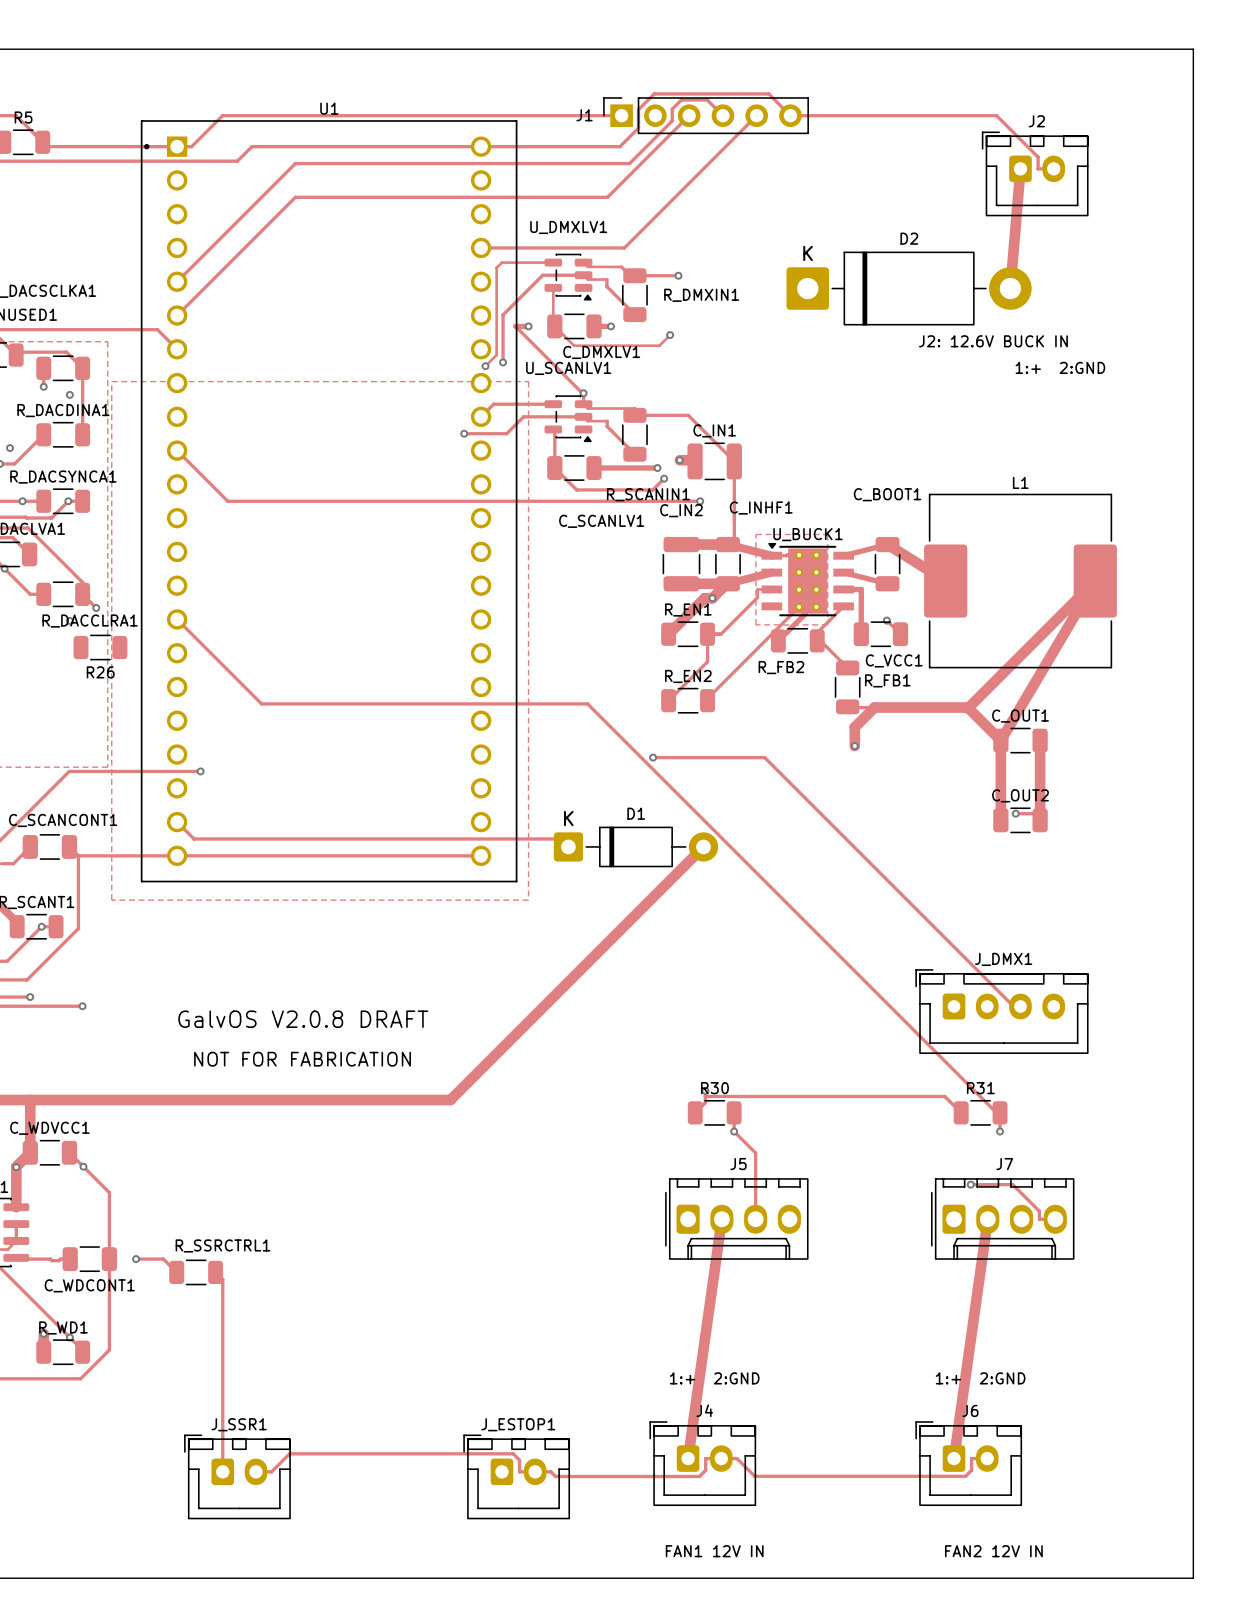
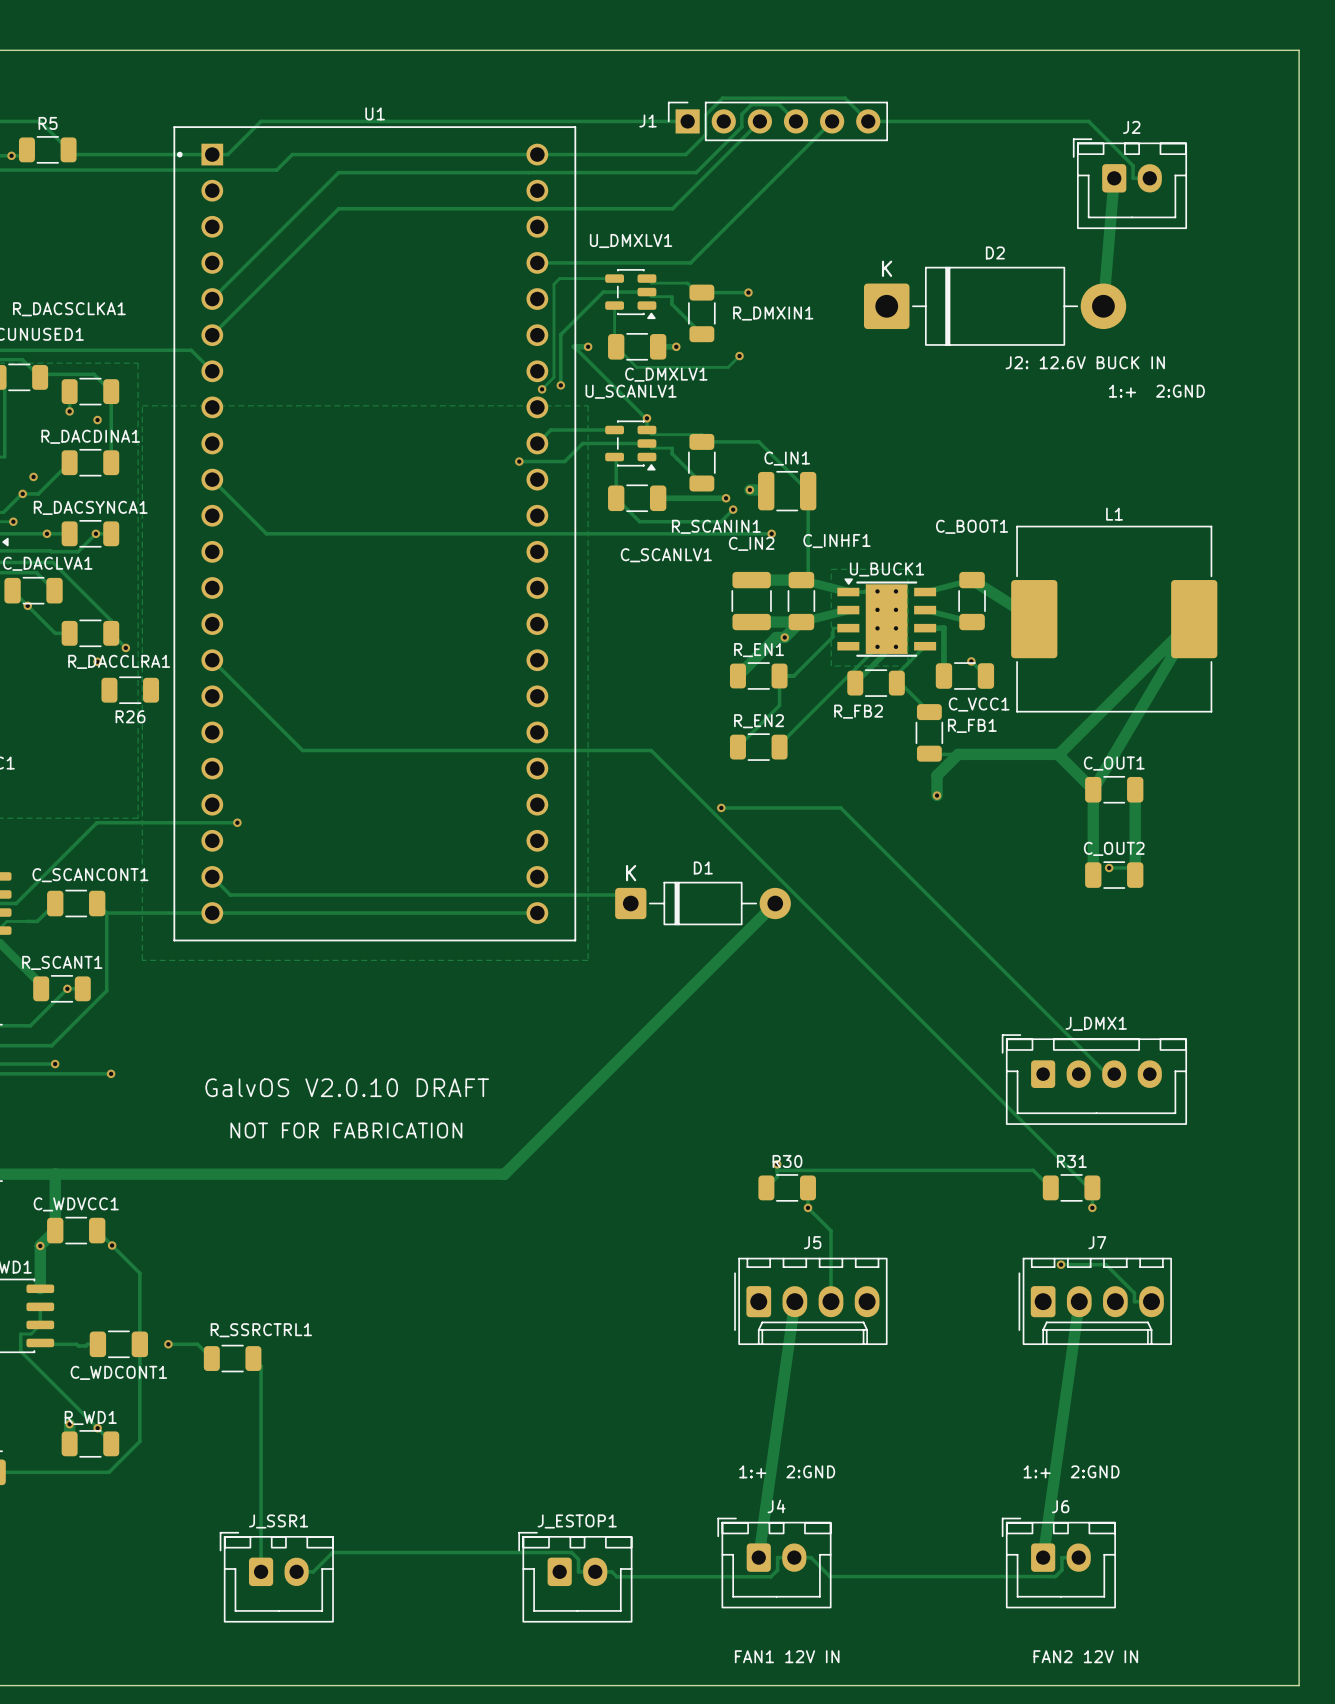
text: GalvOS V2.0.8 DRAFT (303, 1019) -> GalvOS V2.0.10 DRAFT (347, 1087)

